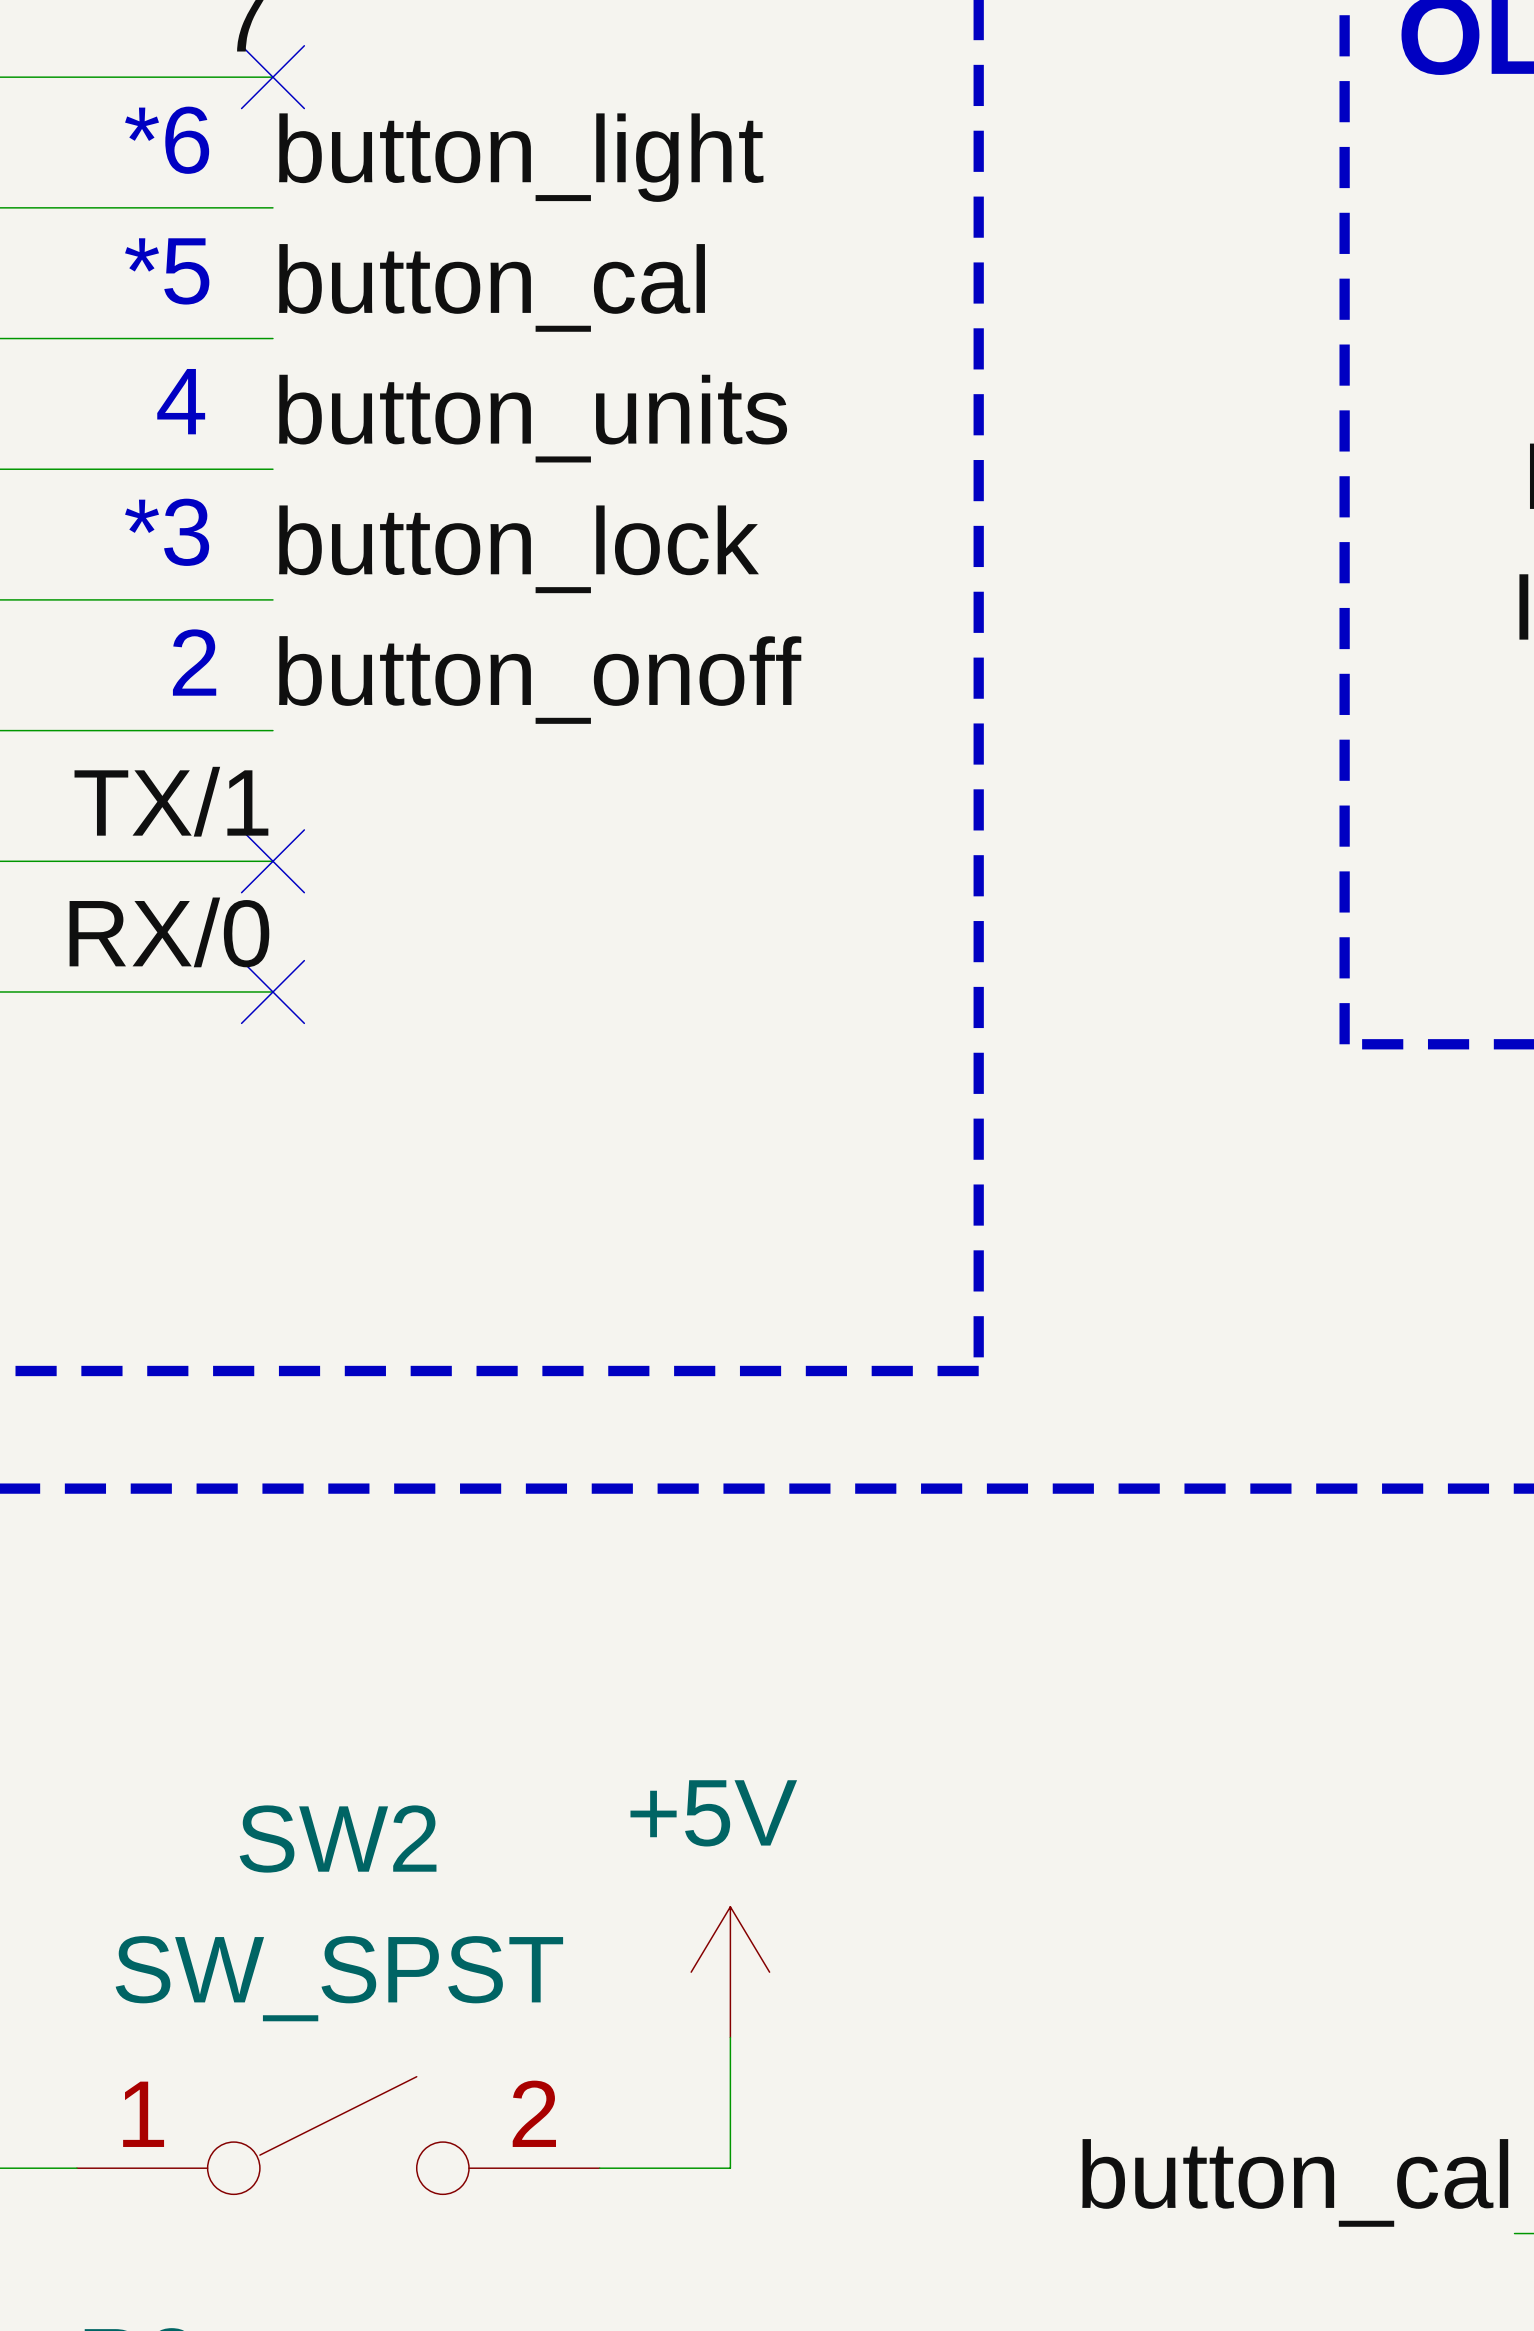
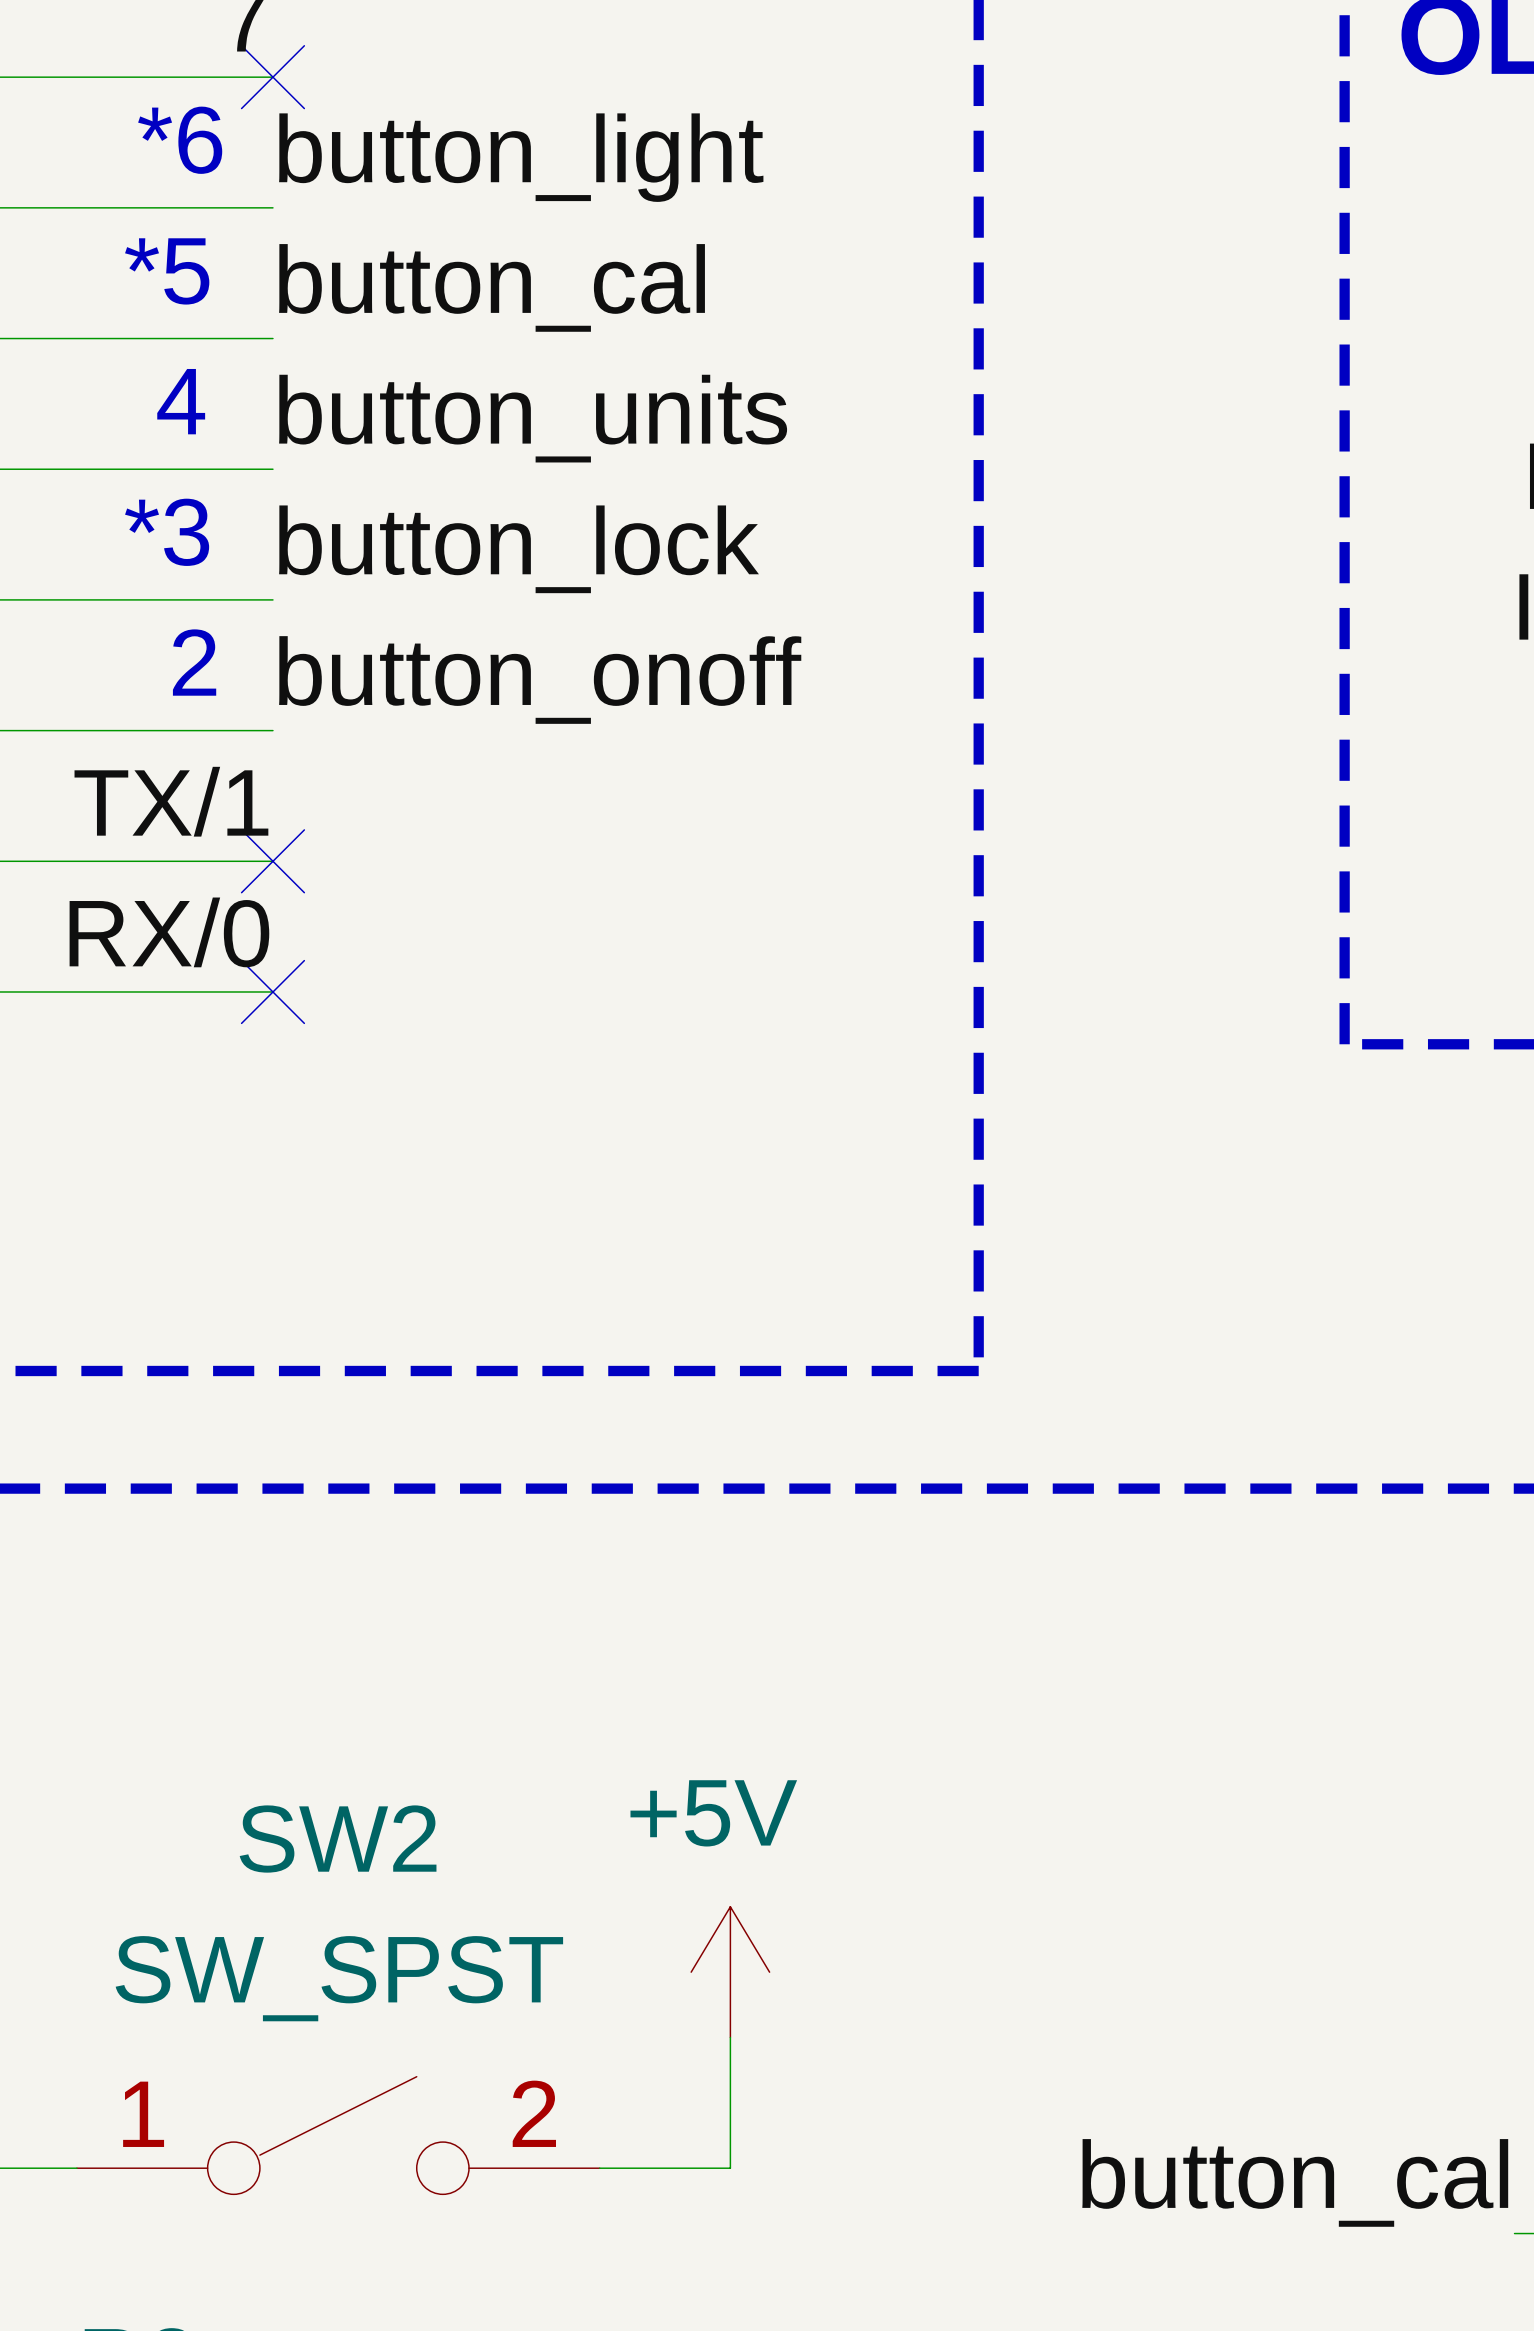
text position: *6 (167, 140) -> *6 (180, 140)

